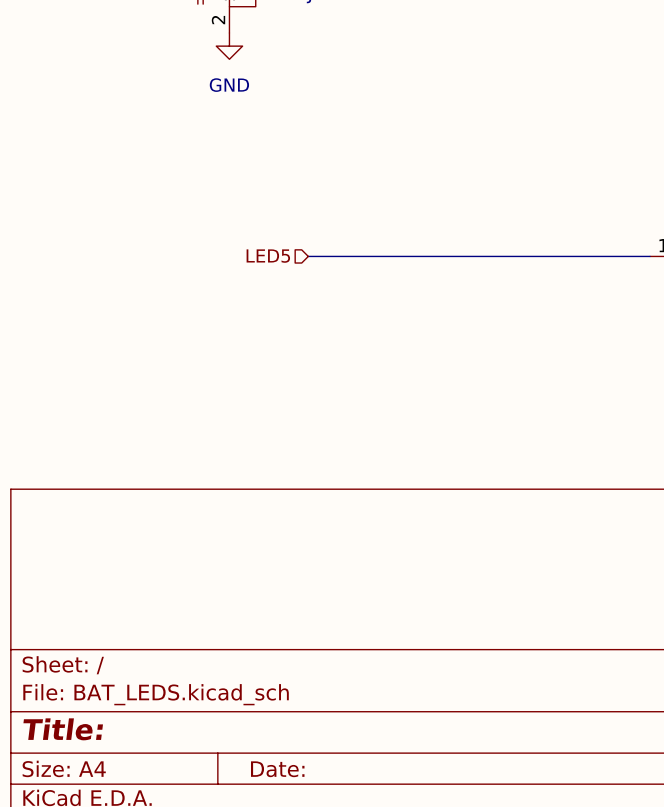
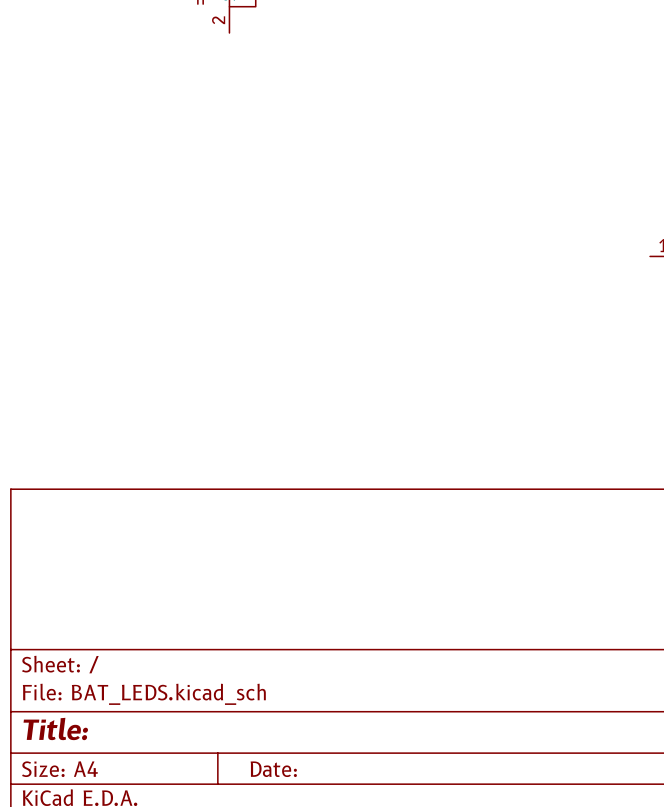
power symbol: GND (229, 46) -> none
hierarchical label: LED5 (268, 256) -> none
wire: (308, 256) (650, 256) -> none

